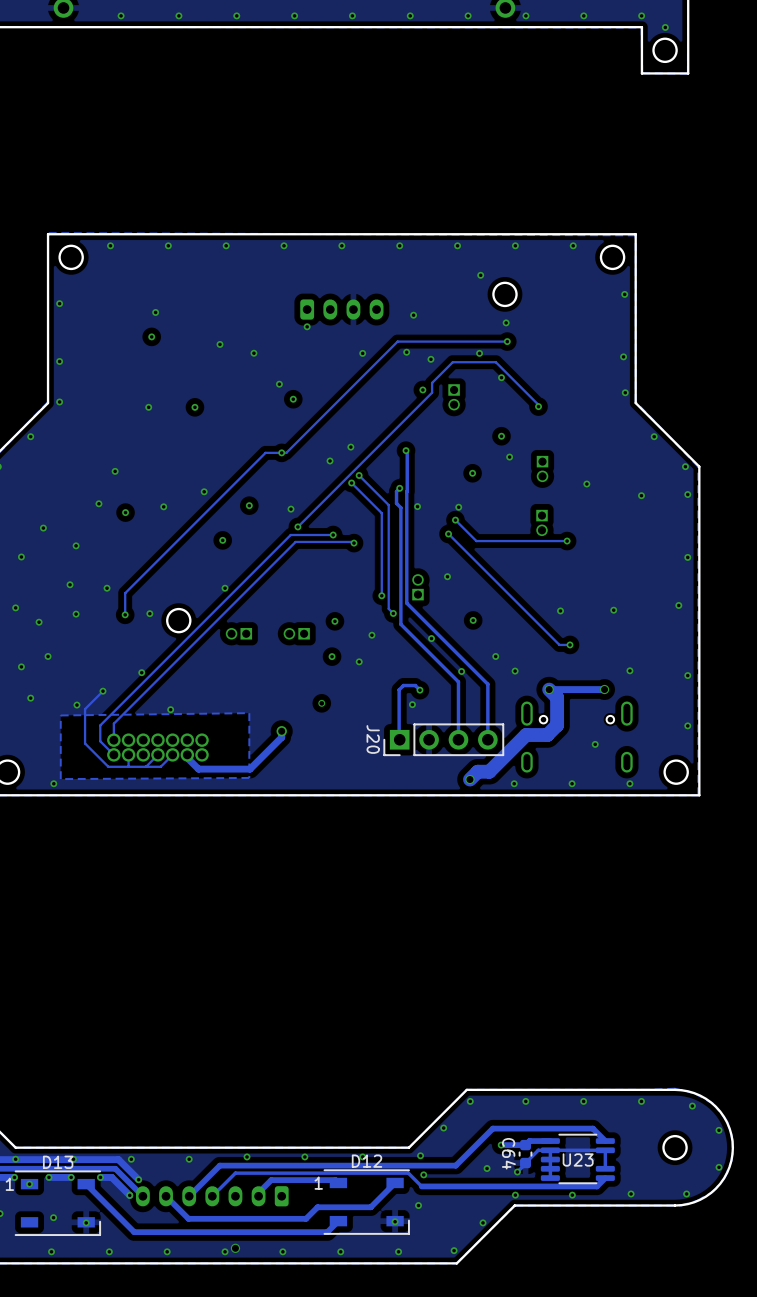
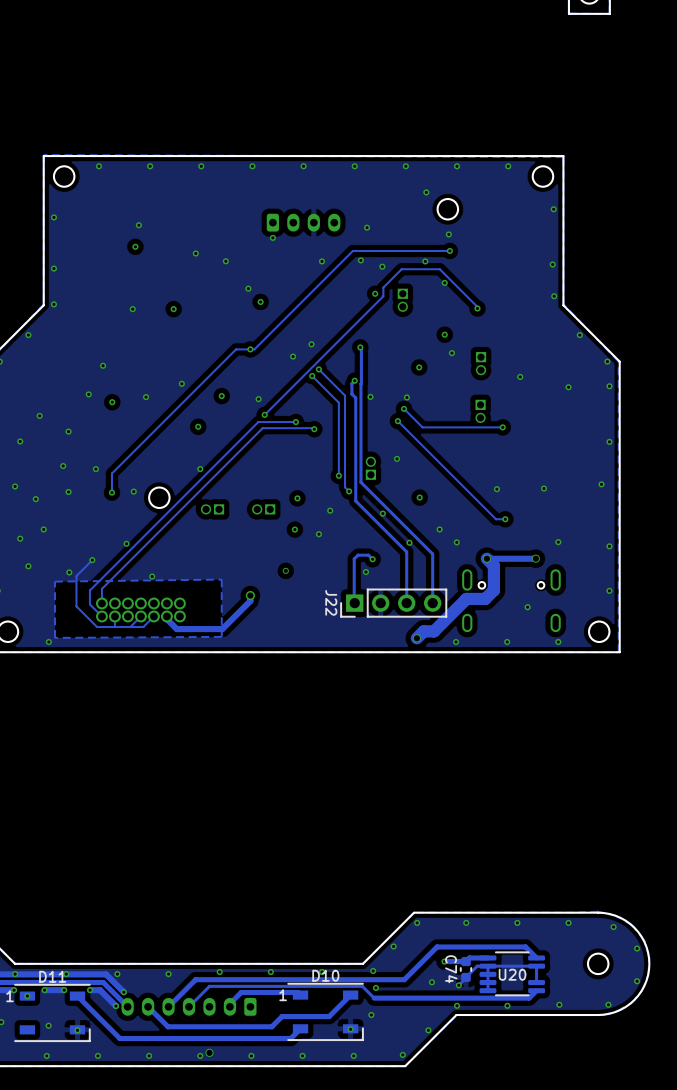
J20 name: J20 (373, 739) -> J22 (331, 602)
C64 name: C64 (508, 1153) -> C74 (451, 969)
U23 name: U23 (578, 1159) -> U20 (512, 974)
D12 name: D12 (367, 1161) -> D10 (325, 975)
D13 name: D13 (58, 1162) -> D11 (52, 976)

